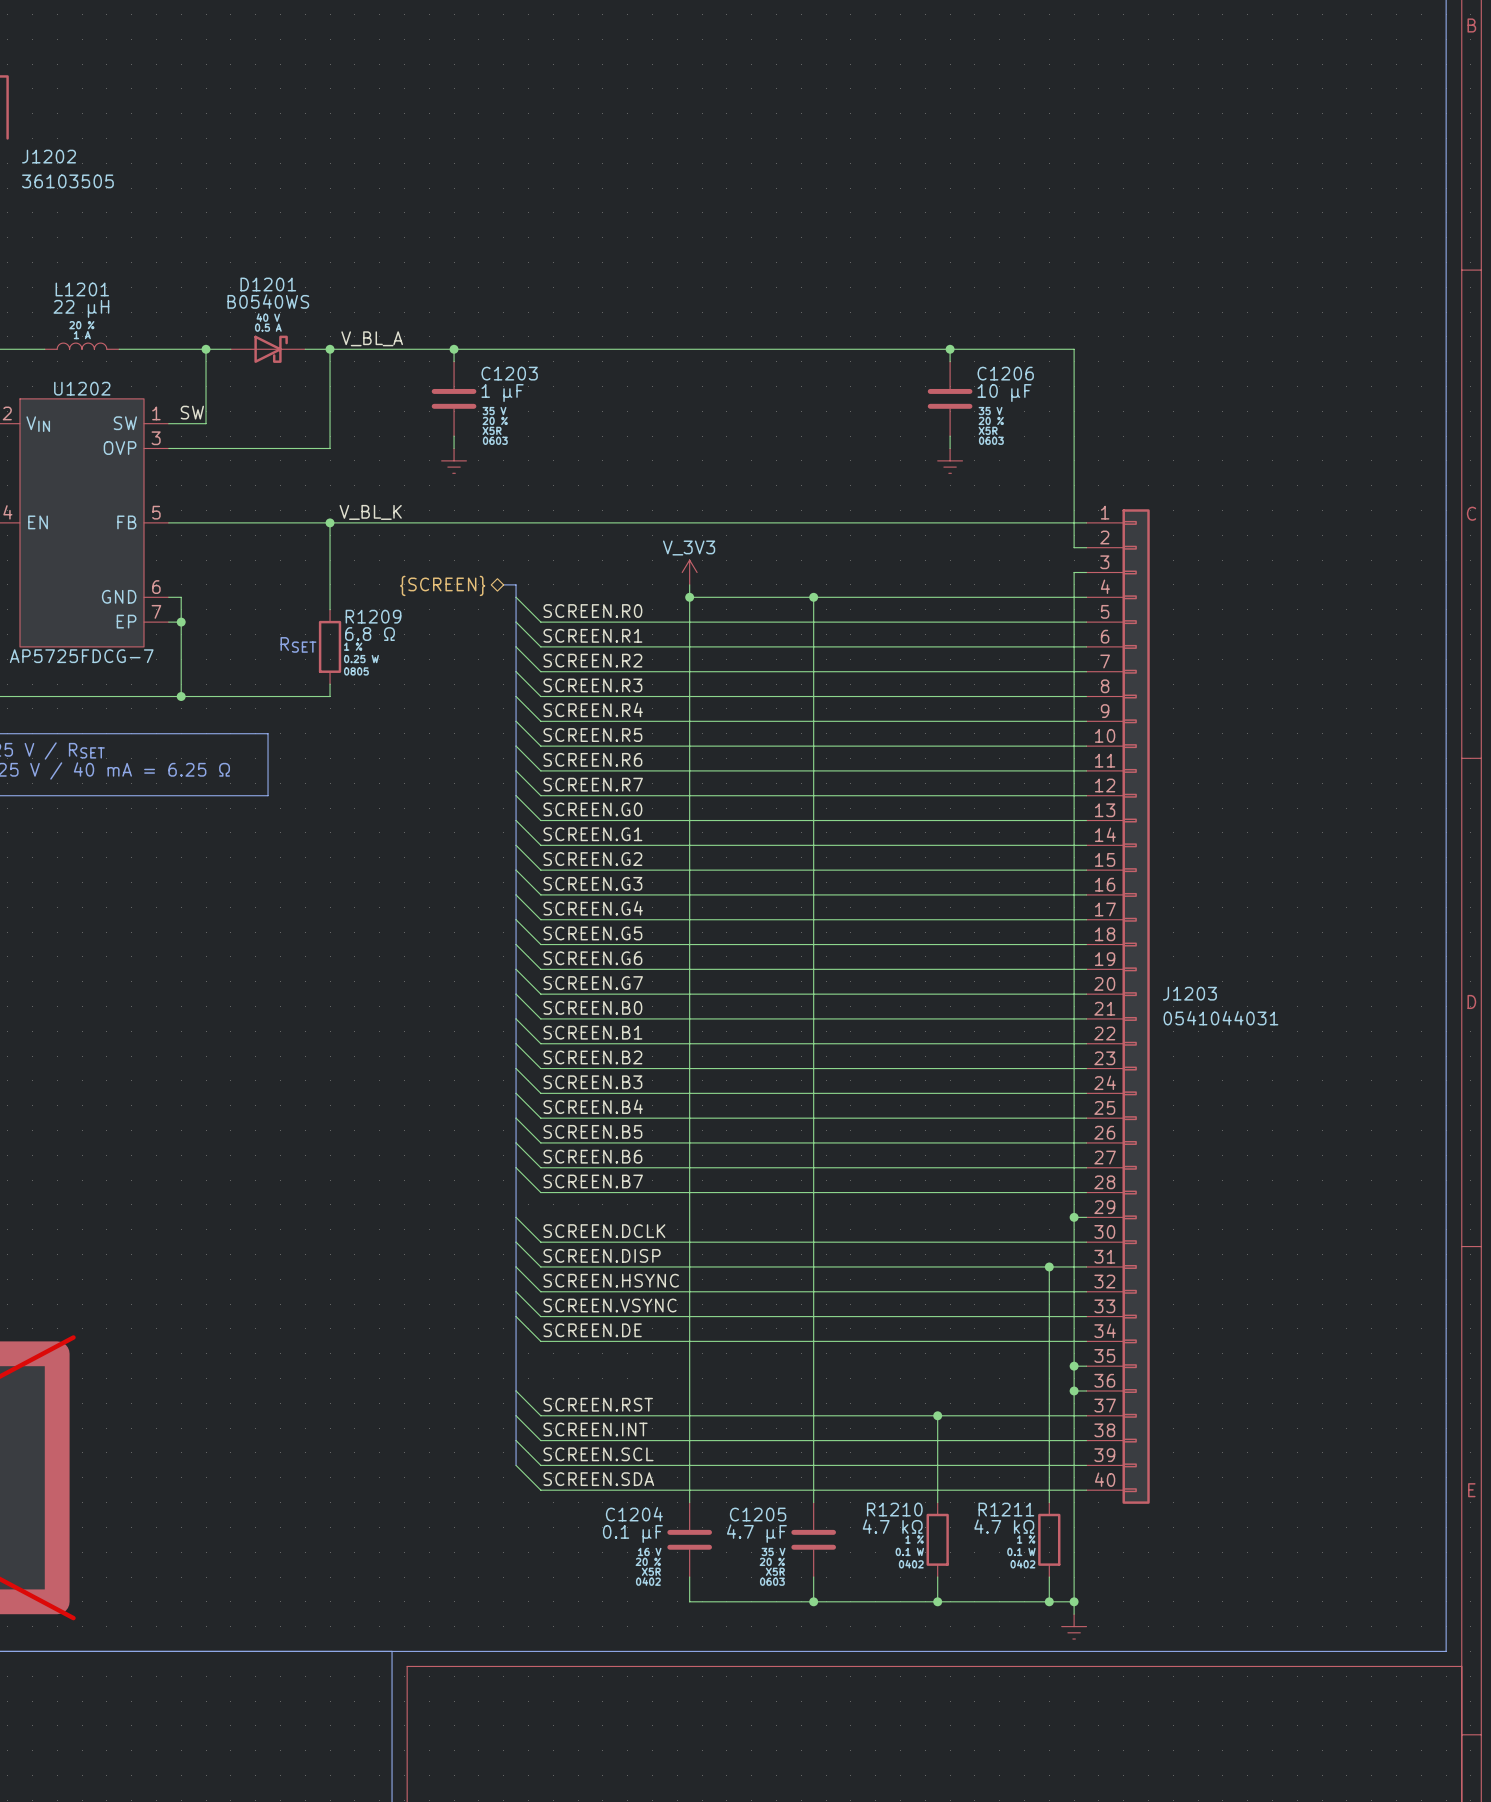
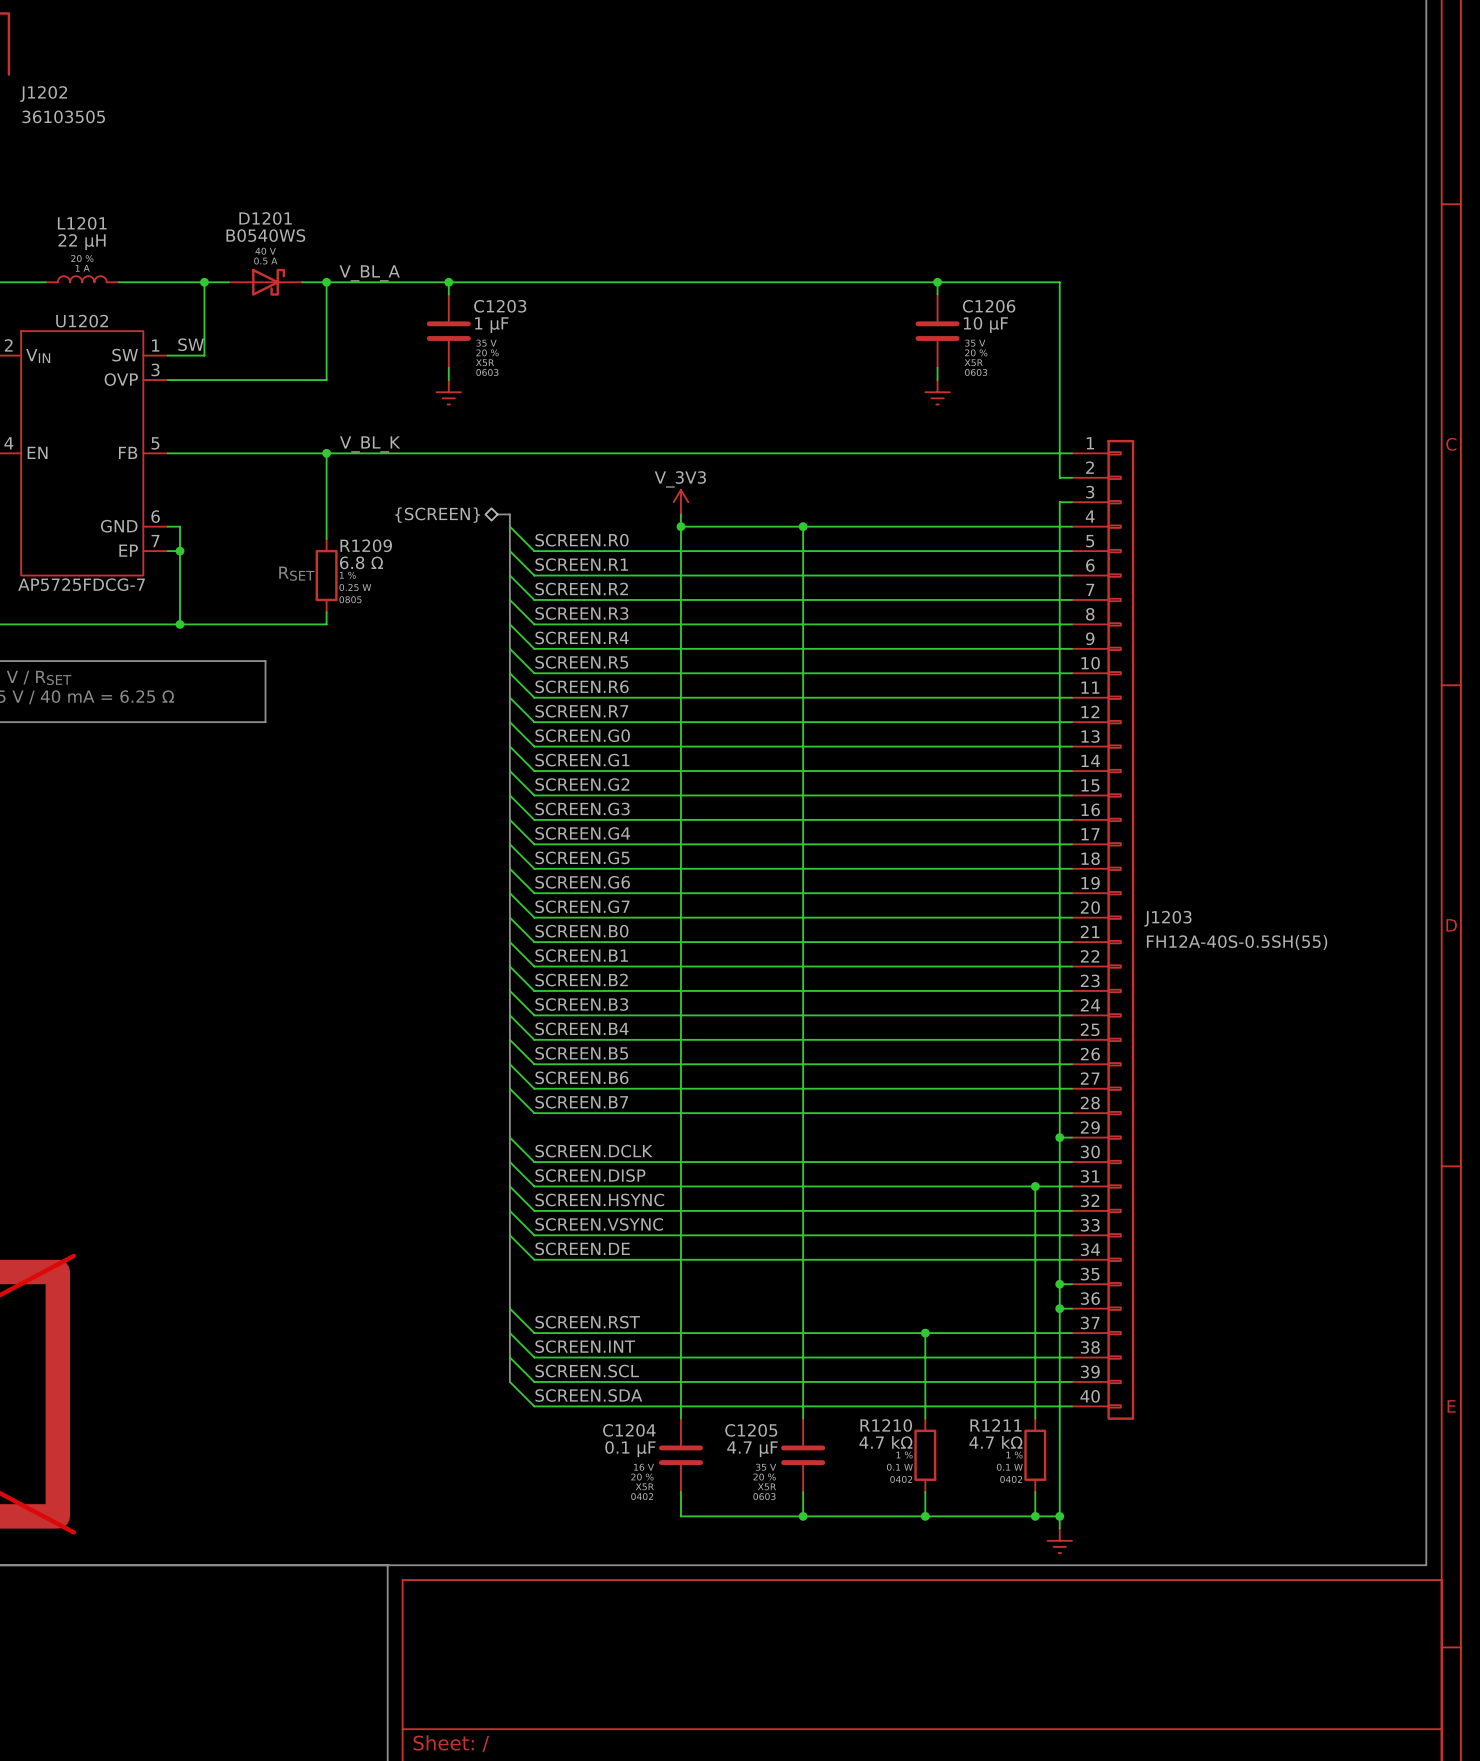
J1203 value: 0541044031 (1220, 1018) -> FH12A-40S-0.5SH(55) (1237, 942)

